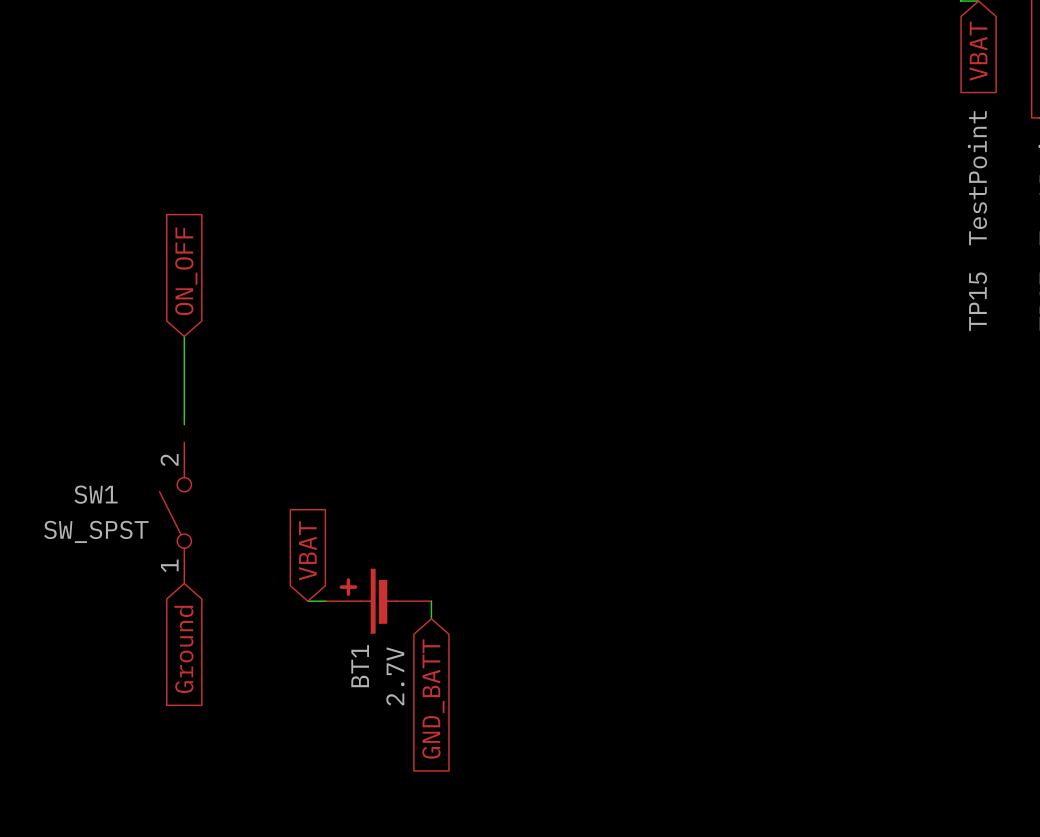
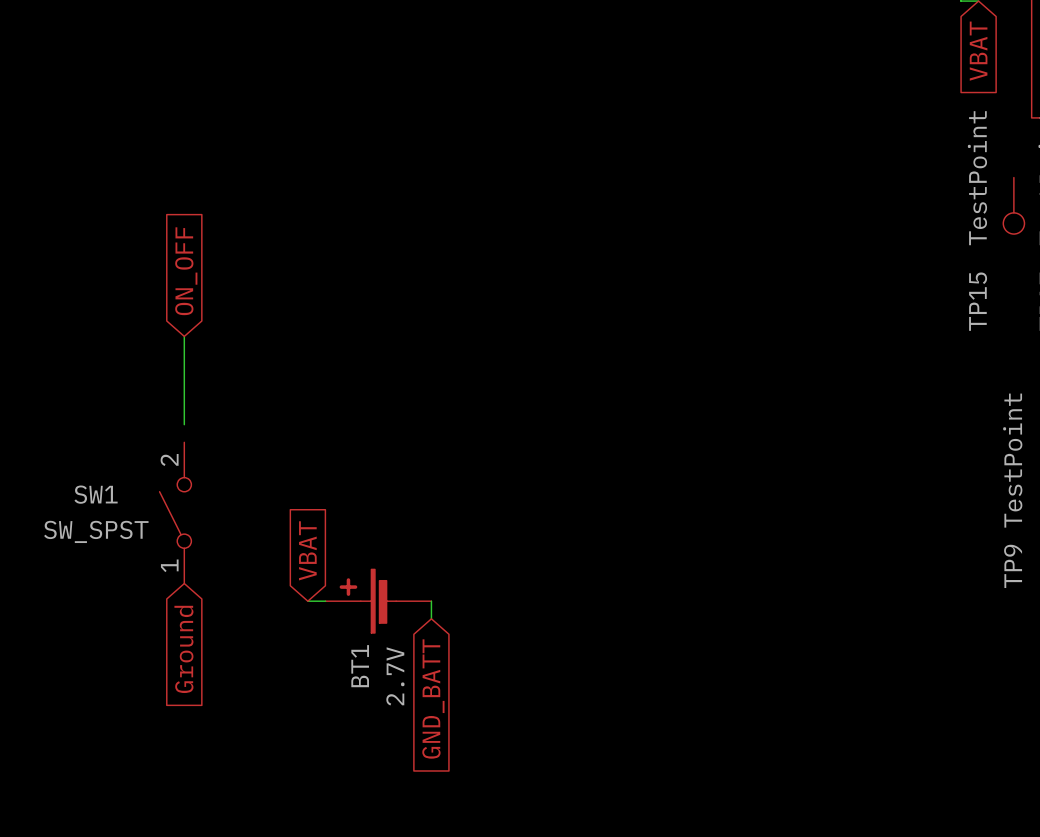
TP9: none -> TestPoint (1013, 205)

